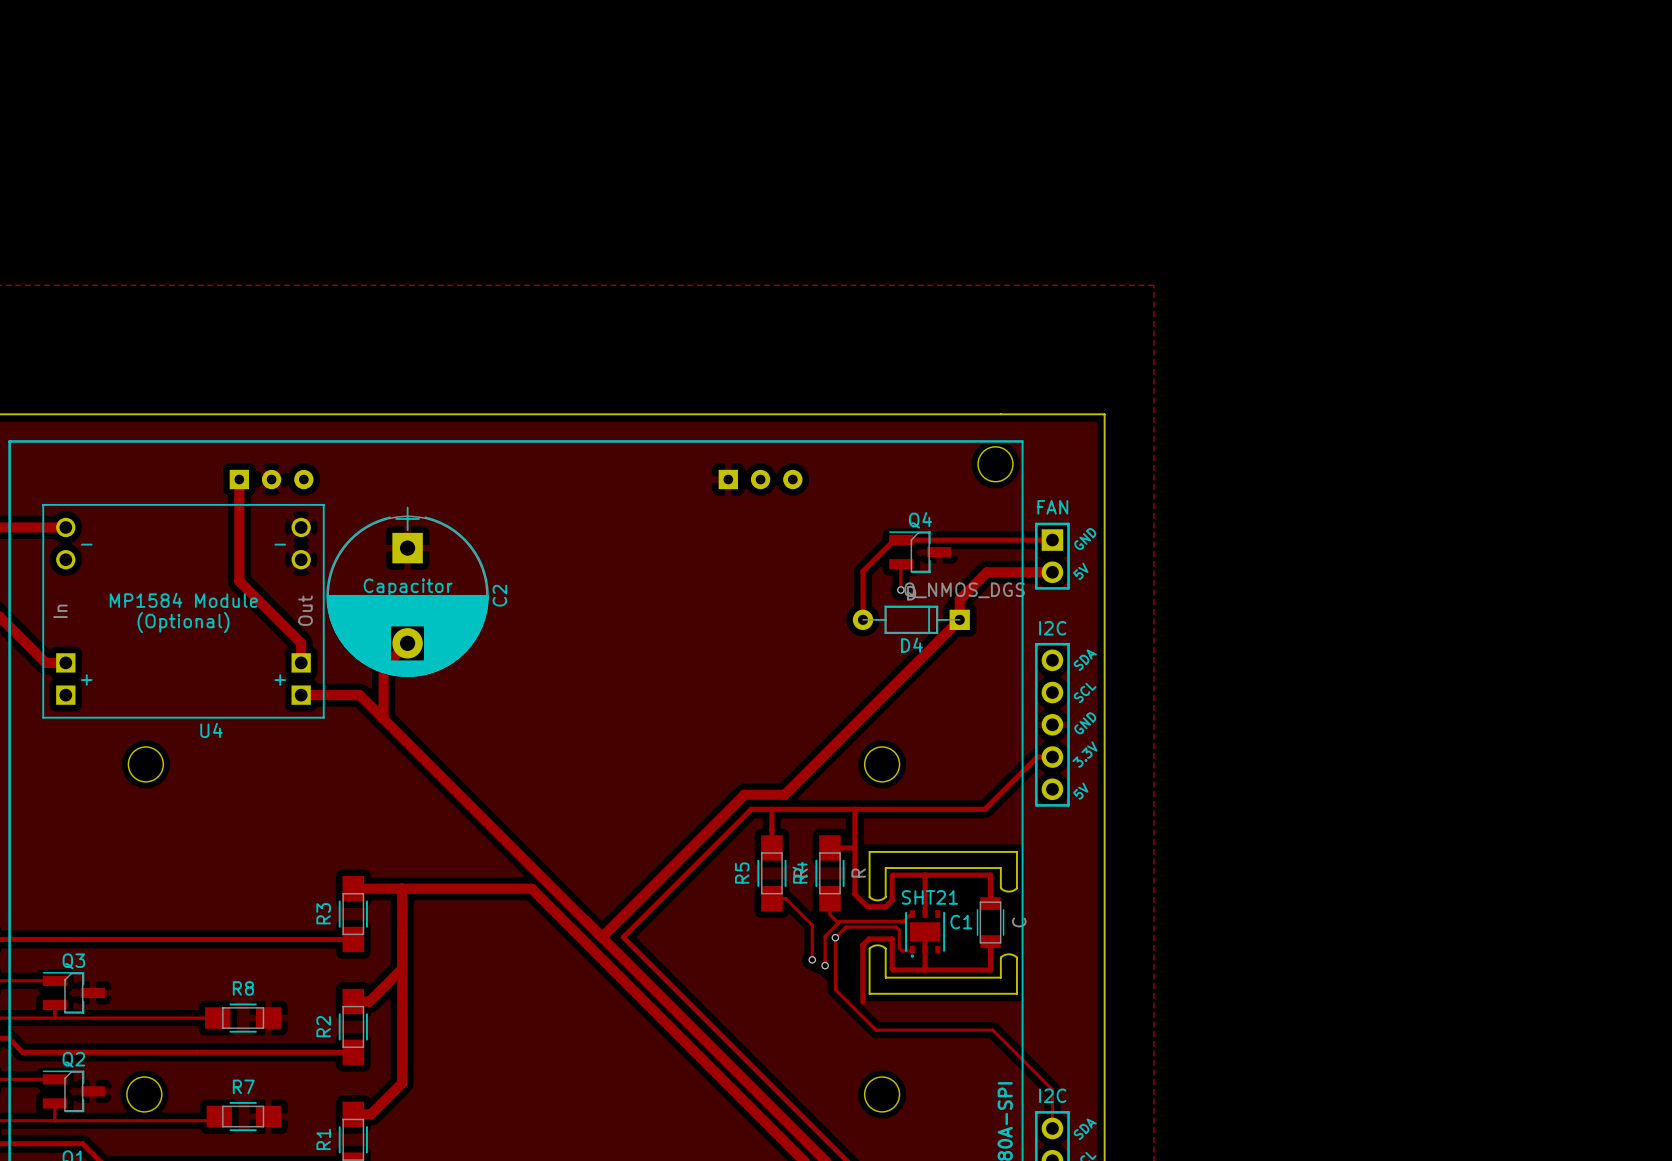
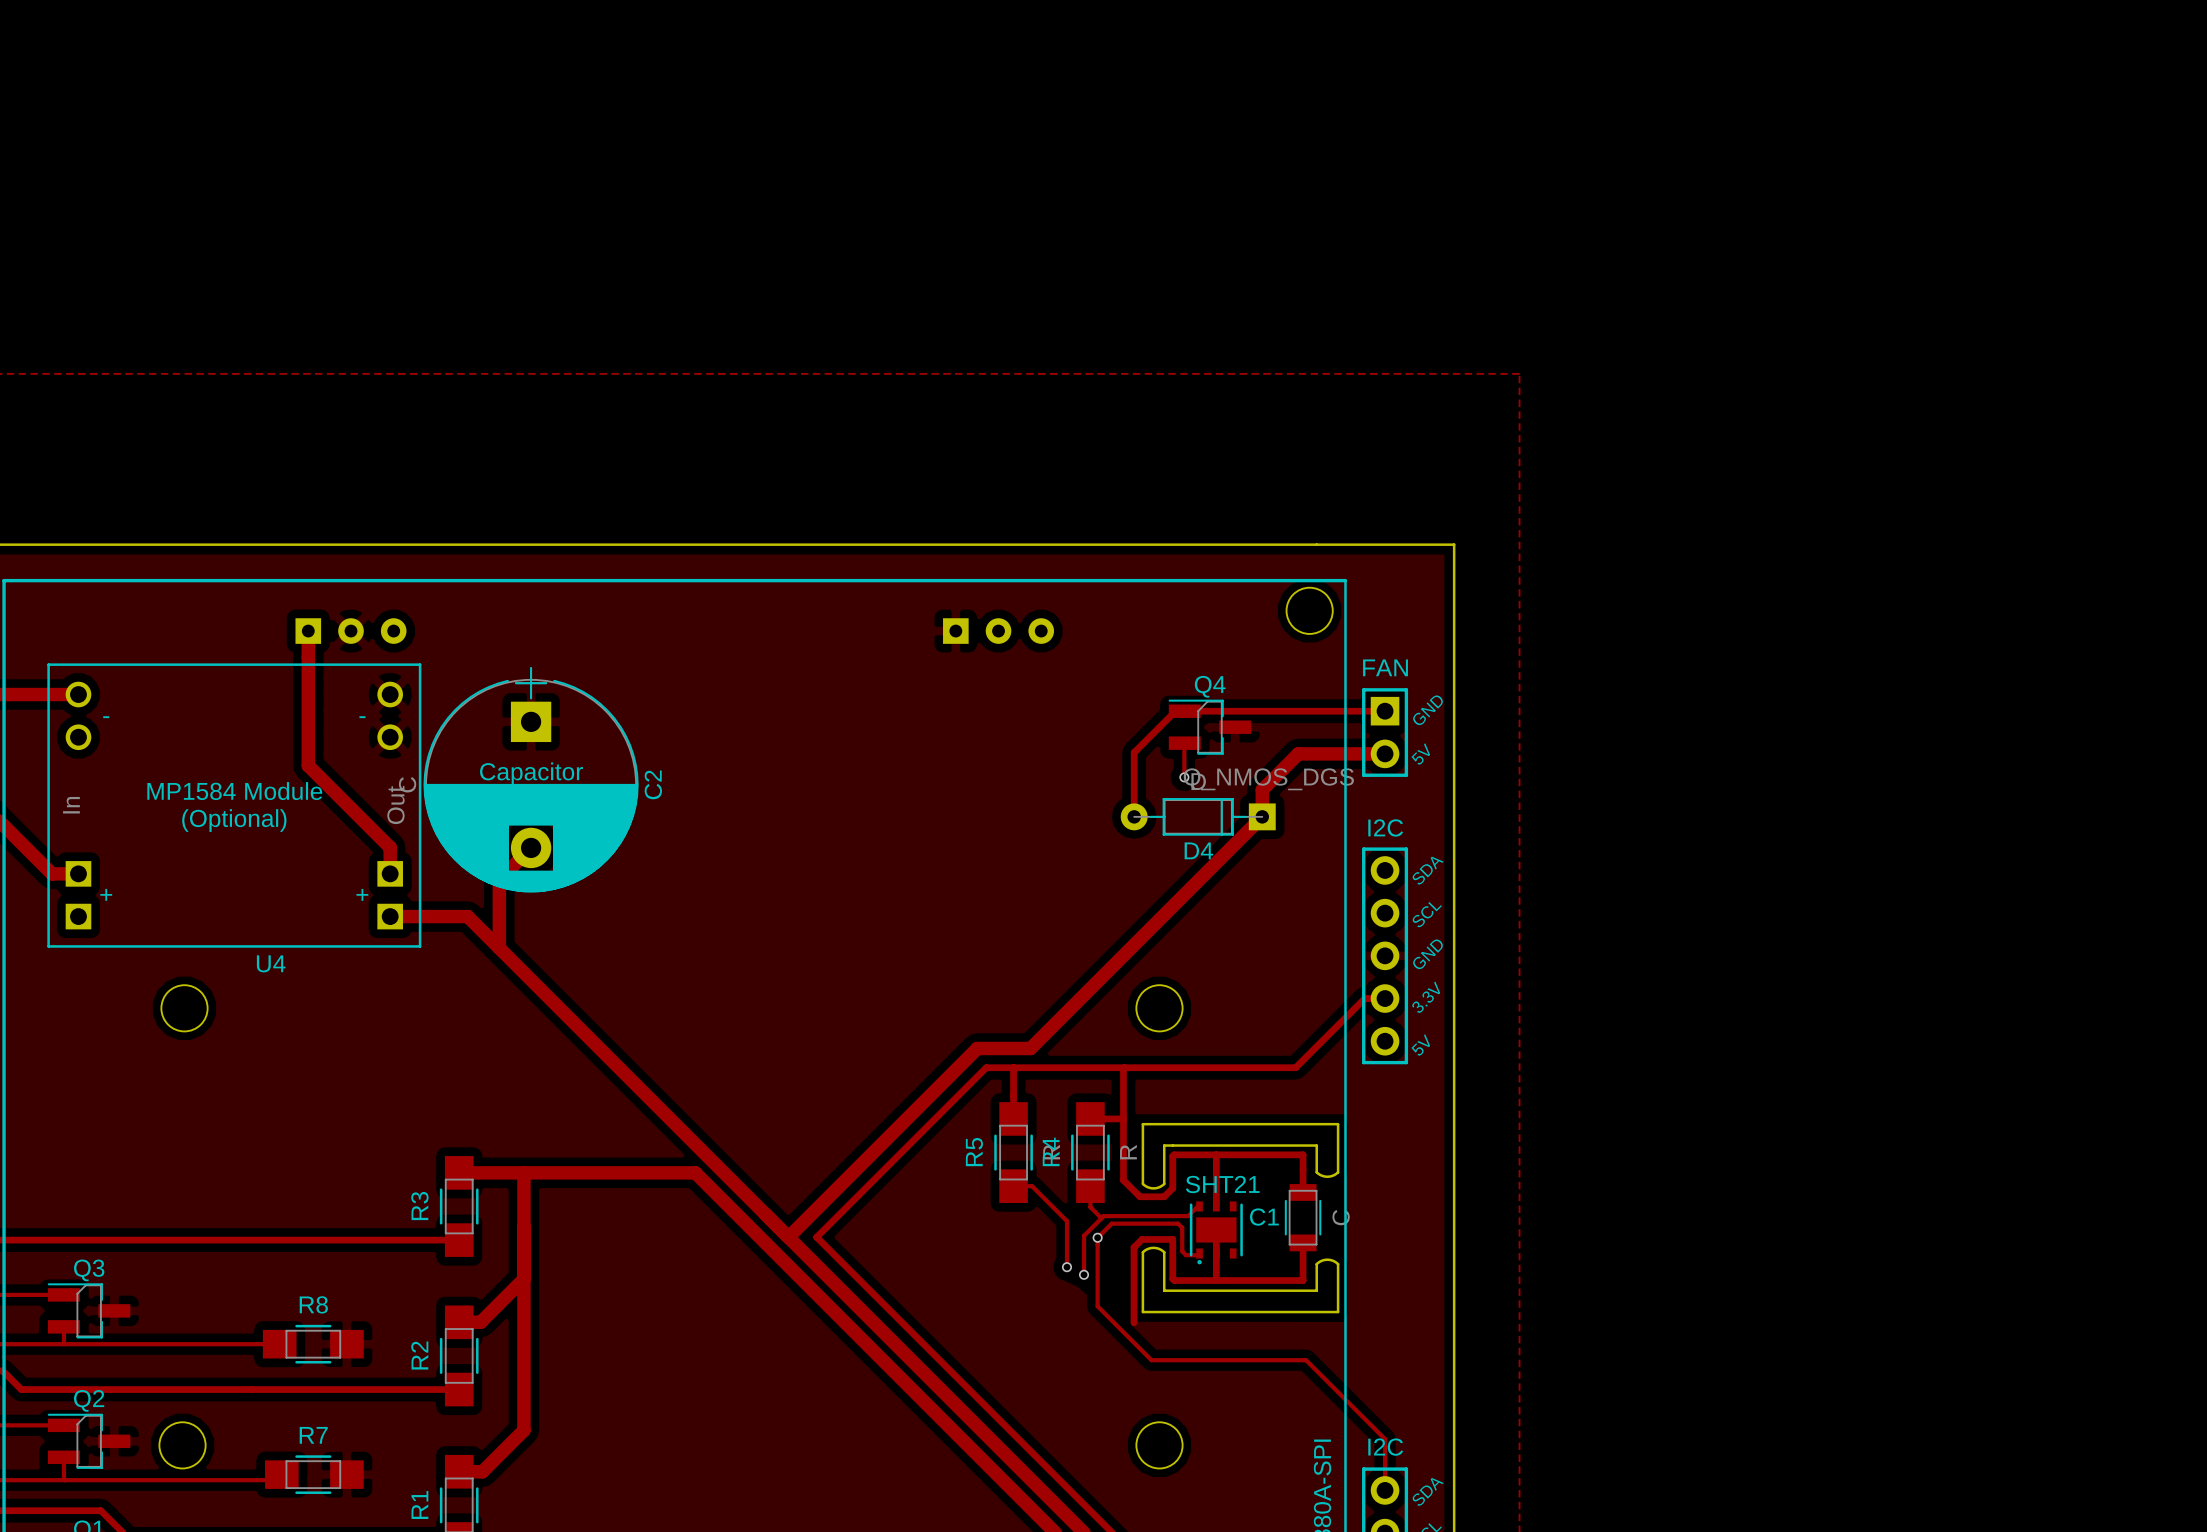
C2 value: none -> C (407, 784)

